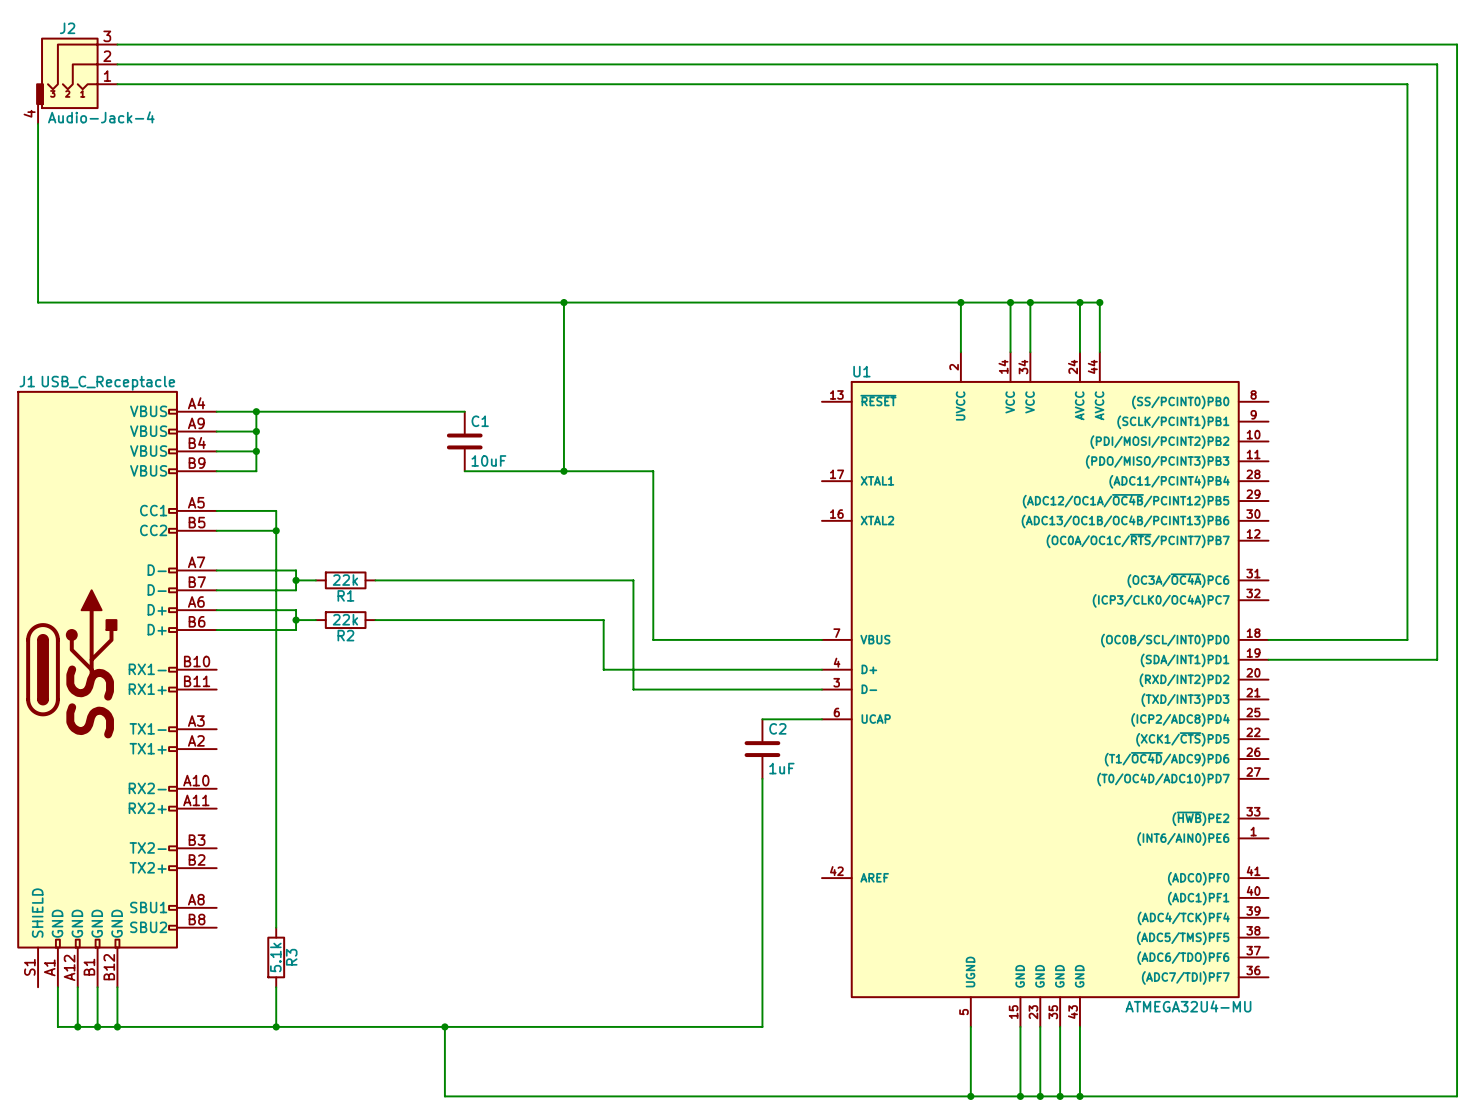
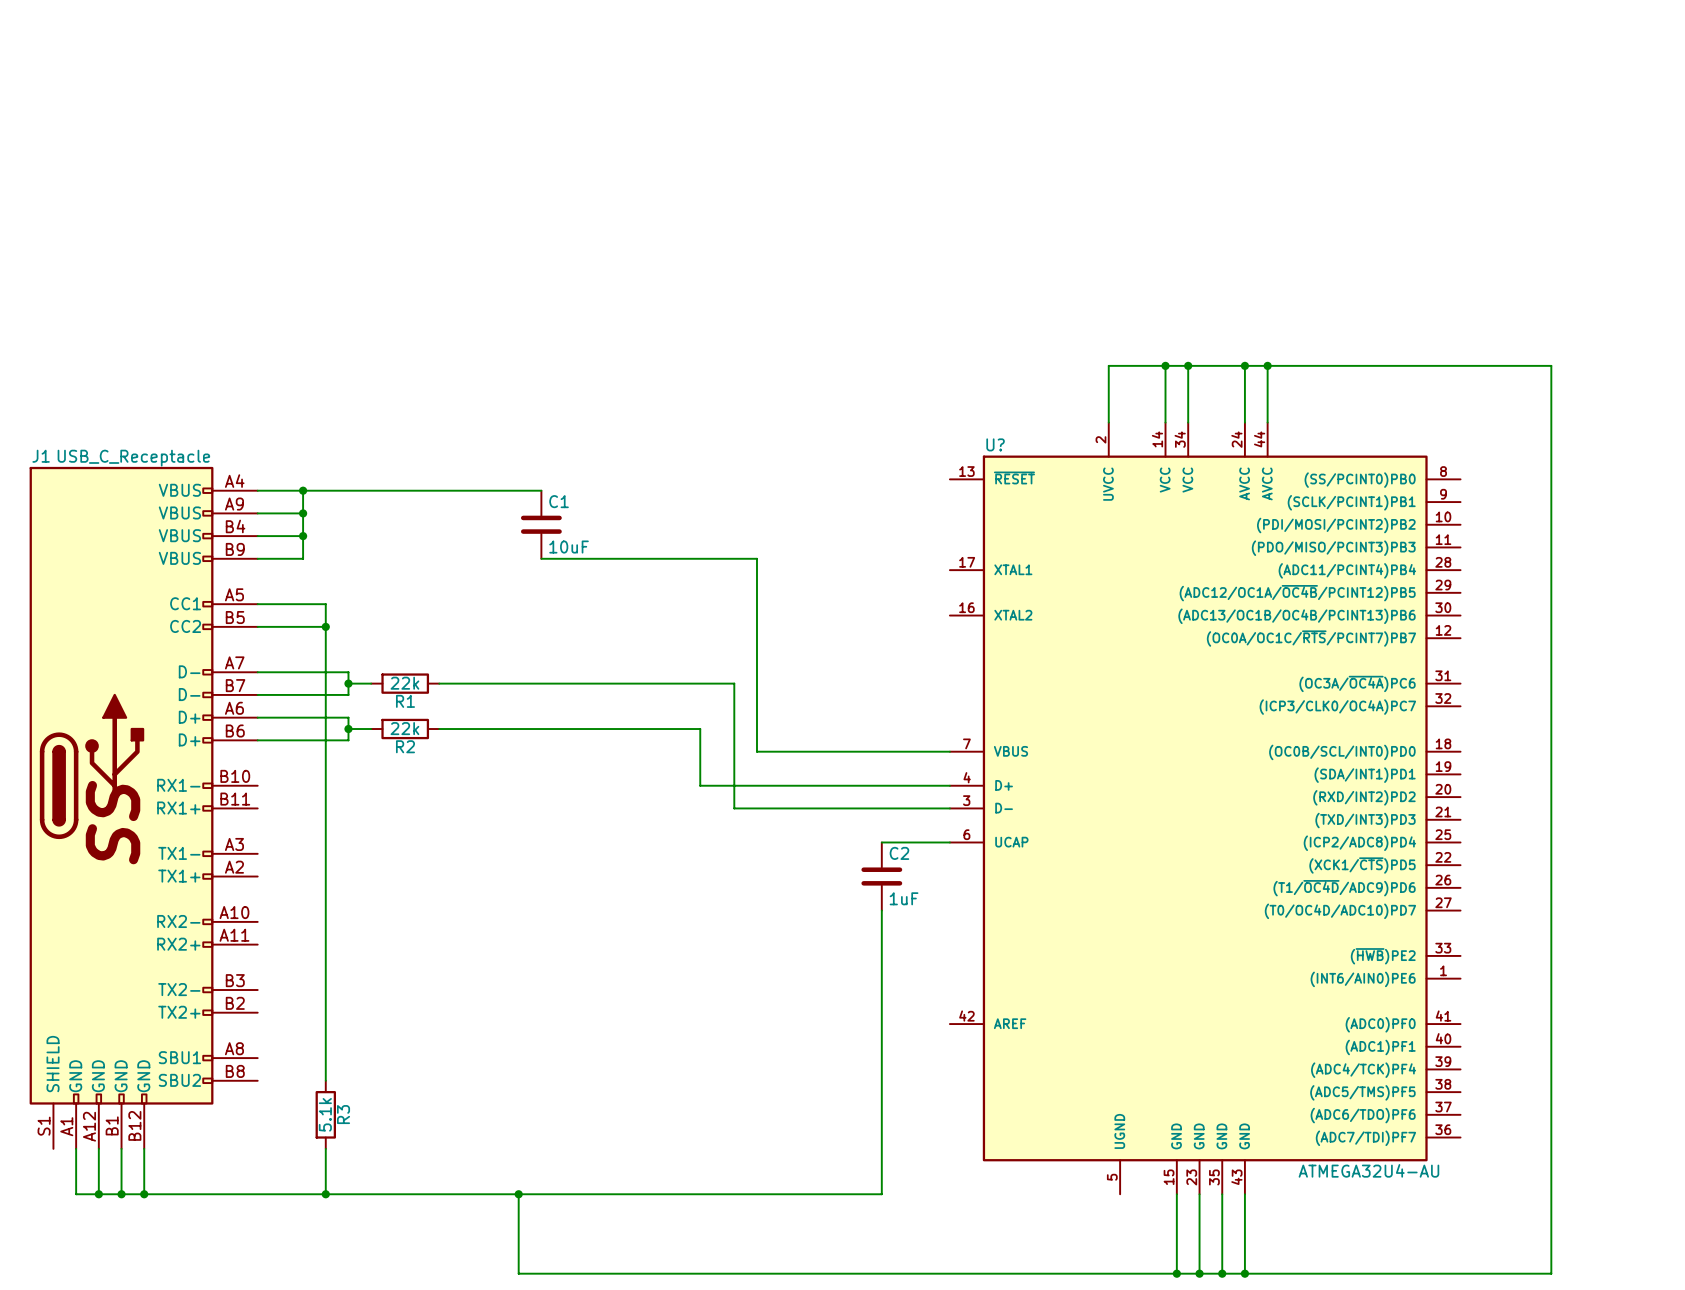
wire: (117, 44) (1457, 44) (1457, 1096) (1347, 1096) -> (1267, 365) (1551, 365) (1551, 1273)
wire: (117, 64) (1437, 64) (1437, 659) (1268, 659) -> none
J2: Audio-Jack-4 (77, 80) -> none
wire: (117, 84) (1407, 84) (1407, 639) (1268, 639) -> none
wire: (38, 123) (38, 302) (960, 302) -> none
wire: (563, 302) (563, 471) -> none
junction: (563, 302) -> none
junction: (960, 302) -> none
U1 name: U1 (861, 371) -> U? (995, 444)
junction: (563, 471) -> none
U1 value: ATMEGA32U4-MU (1188, 1006) -> ATMEGA32U4-AU (1368, 1170)
wire: (970, 1026) (970, 1096) -> none
junction: (970, 1096) -> none

